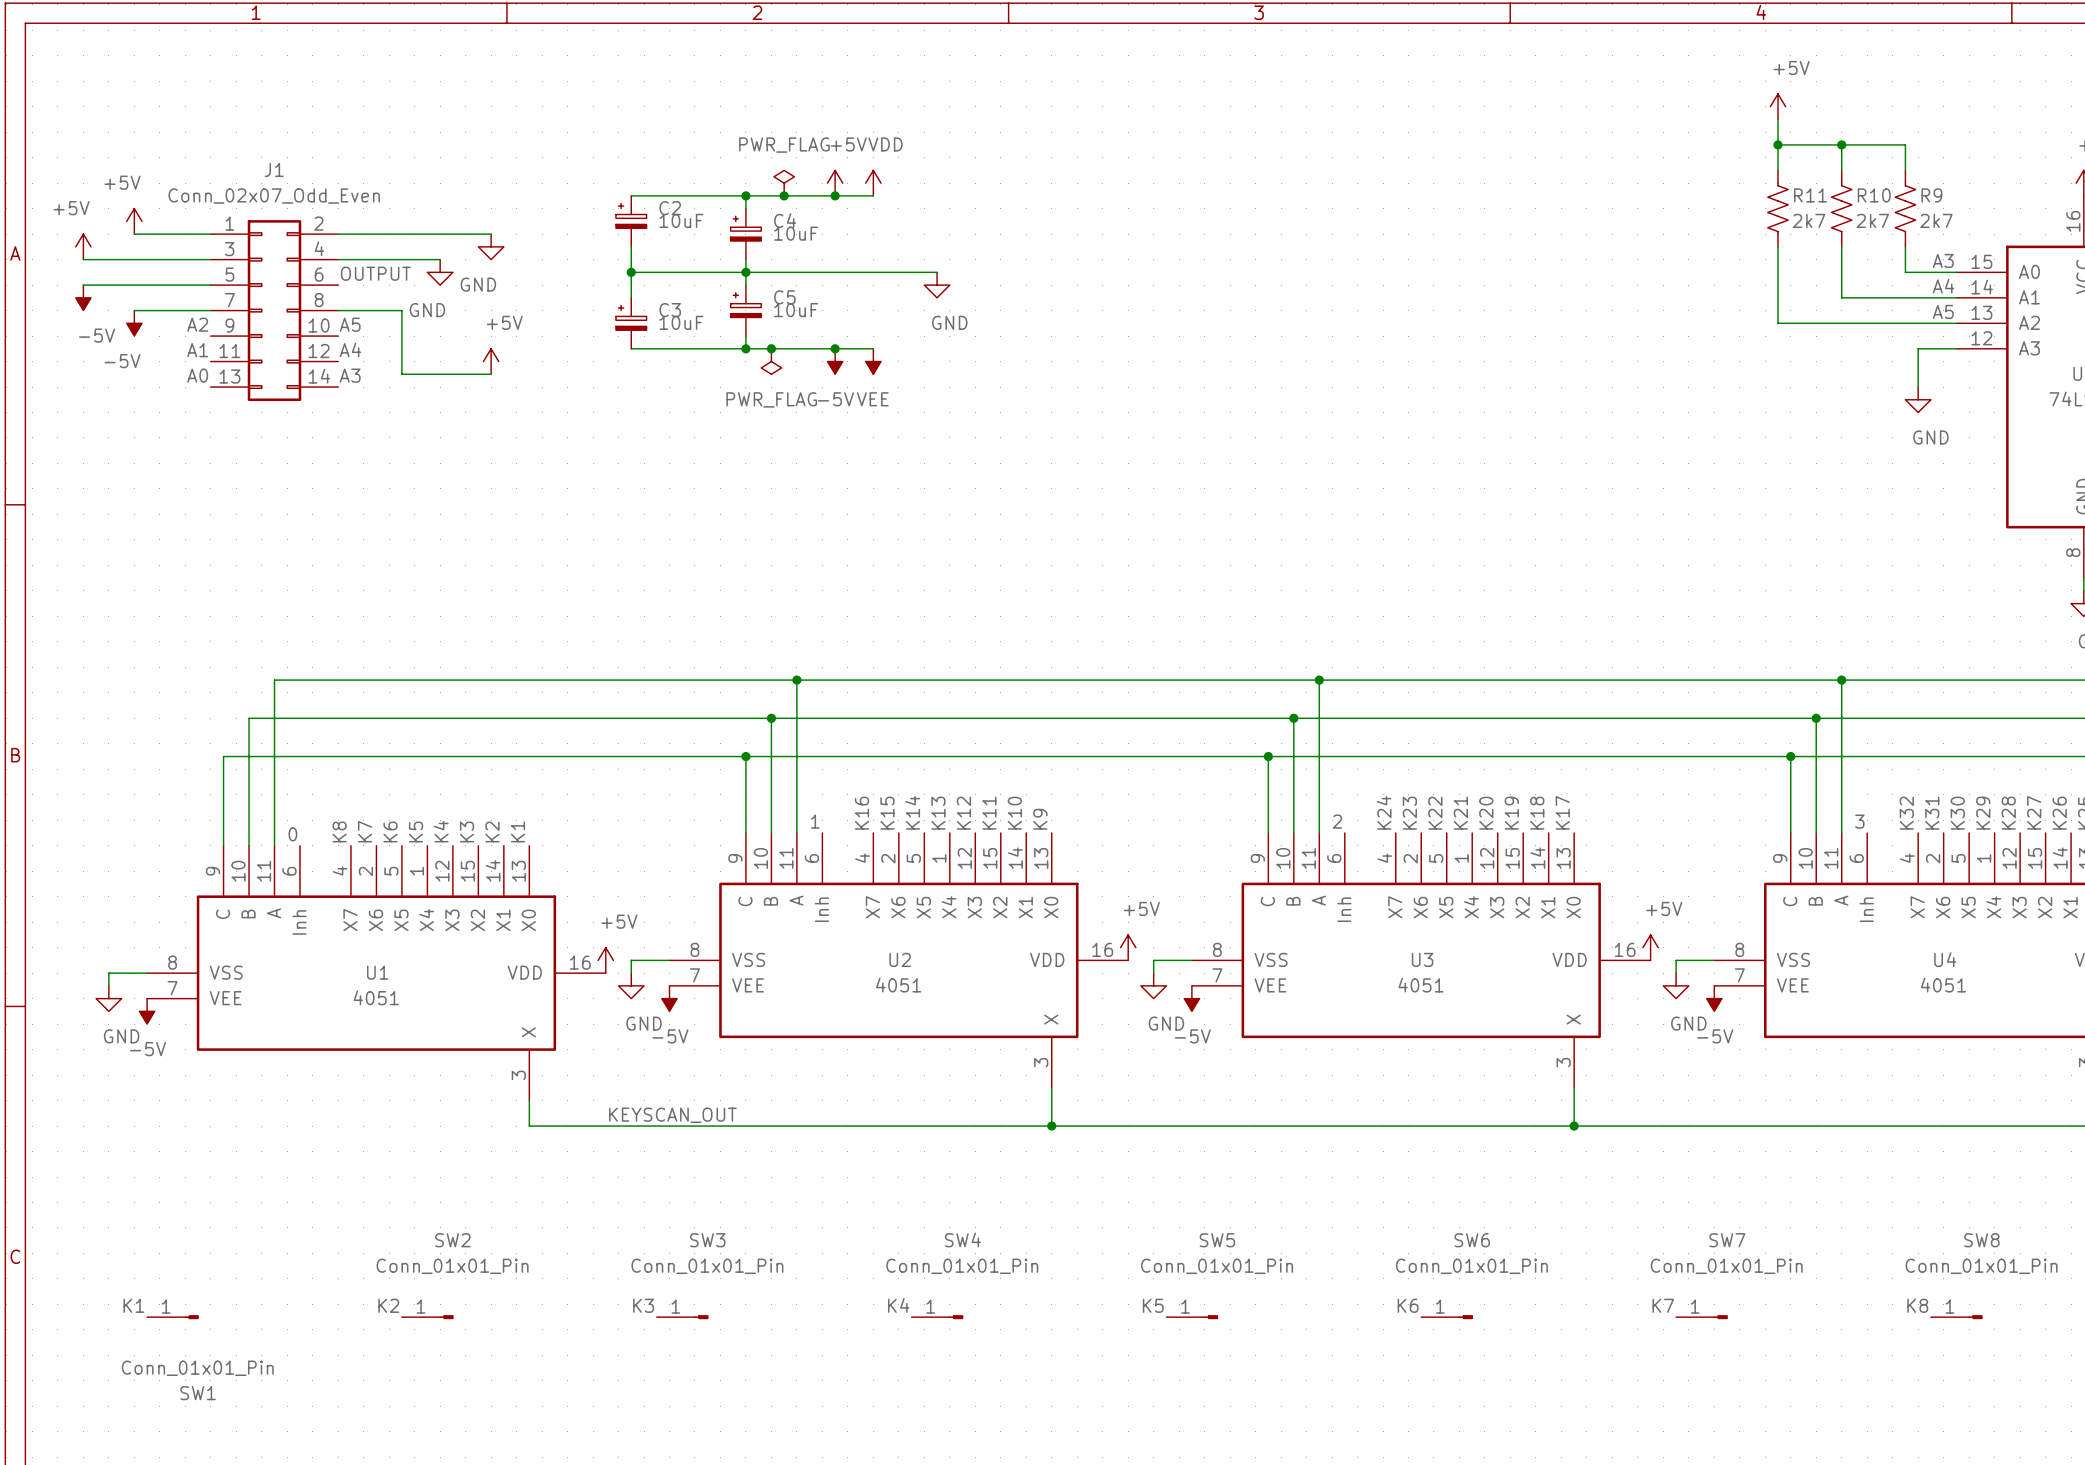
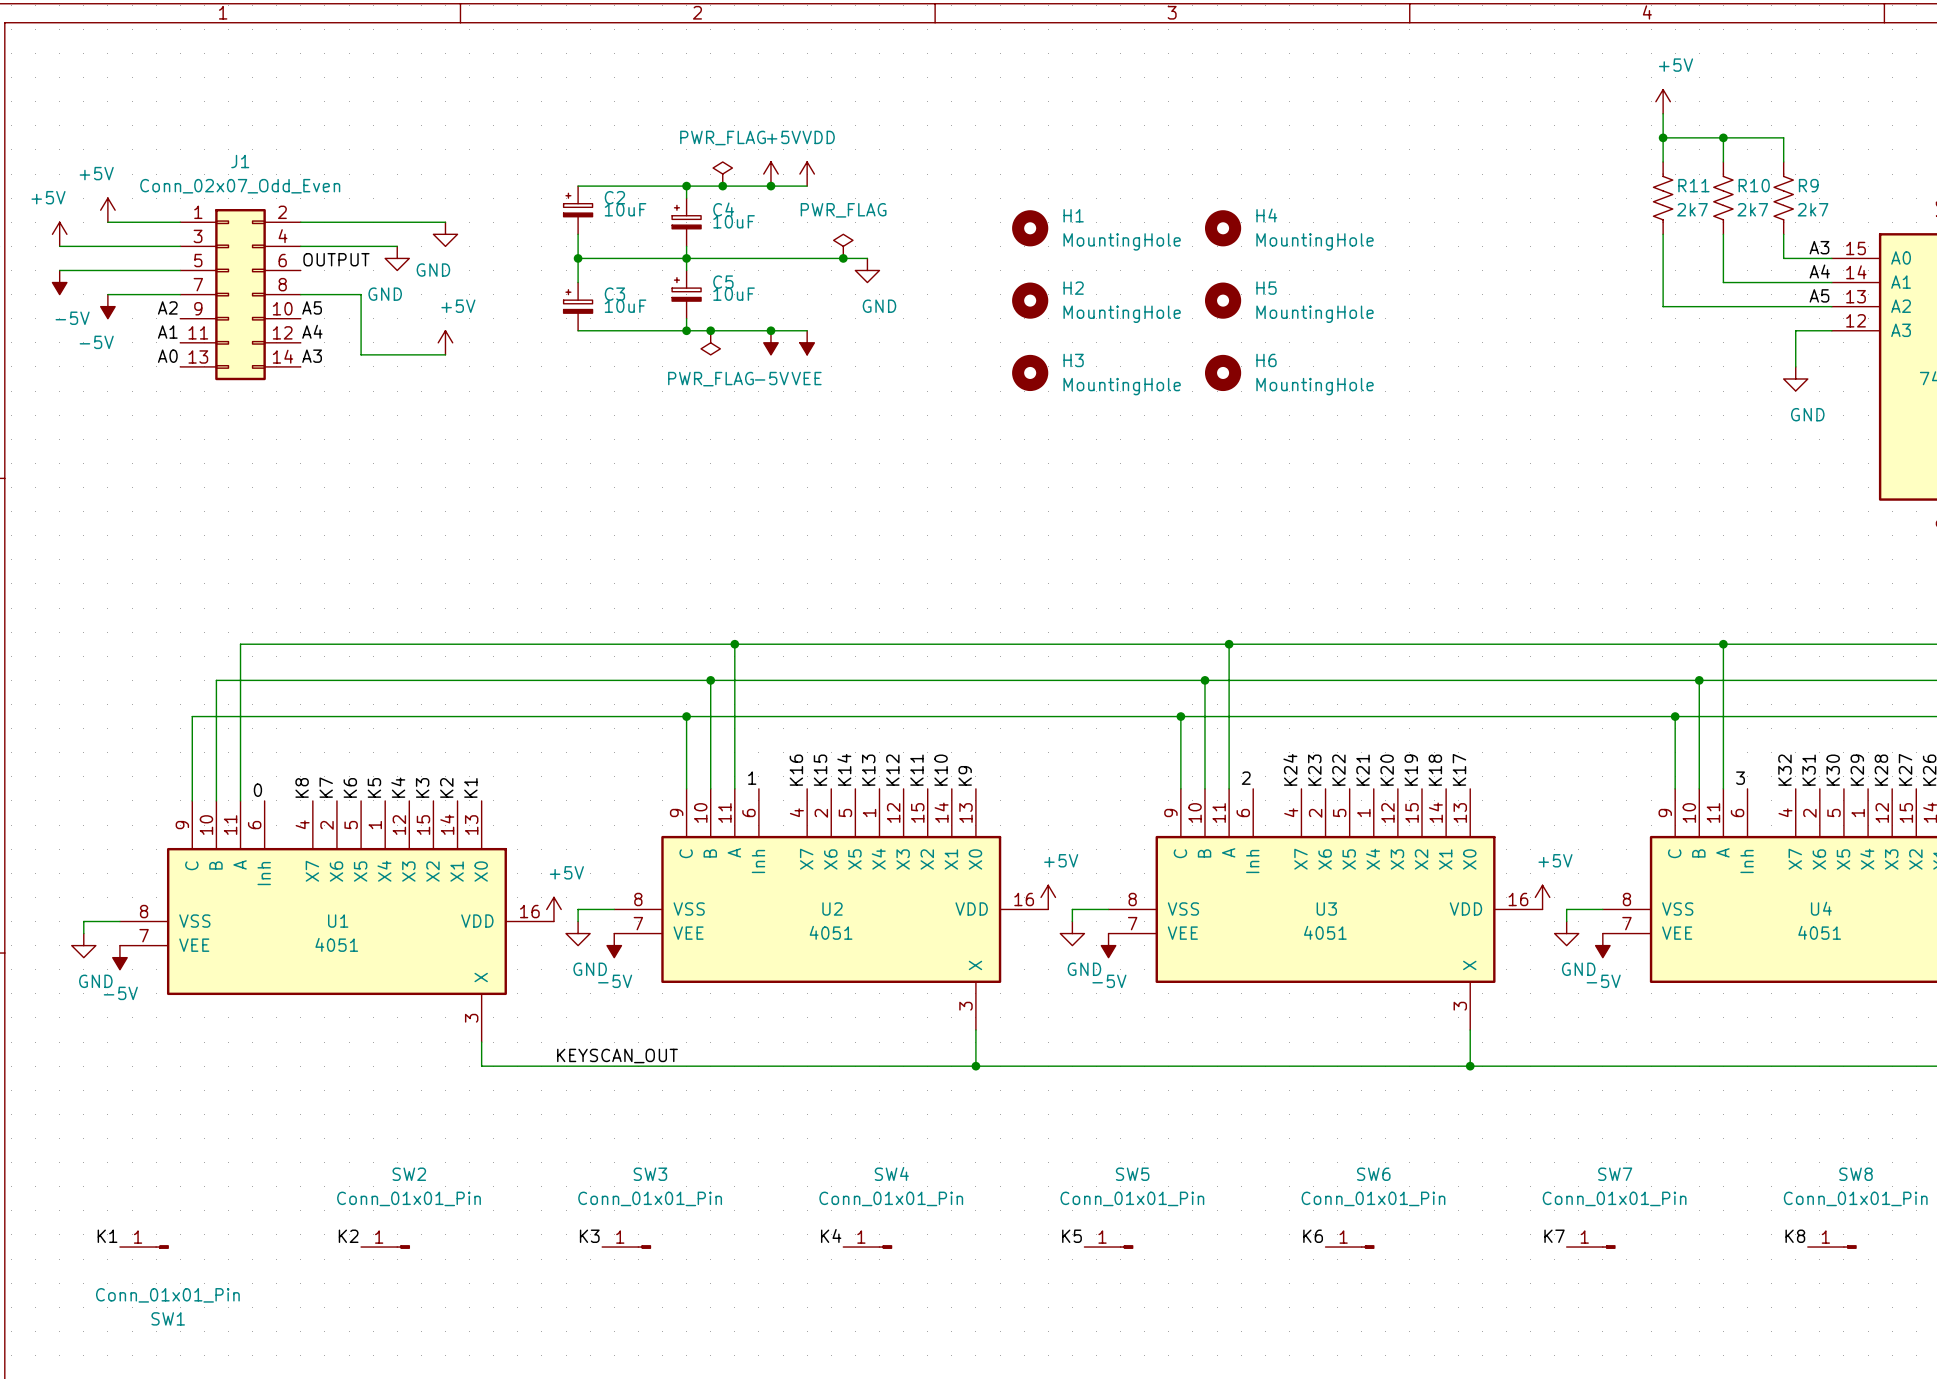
H1: none -> MountingHole (1030, 228)
H4: none -> MountingHole (1223, 228)
power symbol: none -> PWR_FLAG (843, 246)
junction: none -> (843, 258)
H2: none -> MountingHole (1030, 300)
H5: none -> MountingHole (1223, 300)
H3: none -> MountingHole (1030, 372)
H6: none -> MountingHole (1223, 372)

